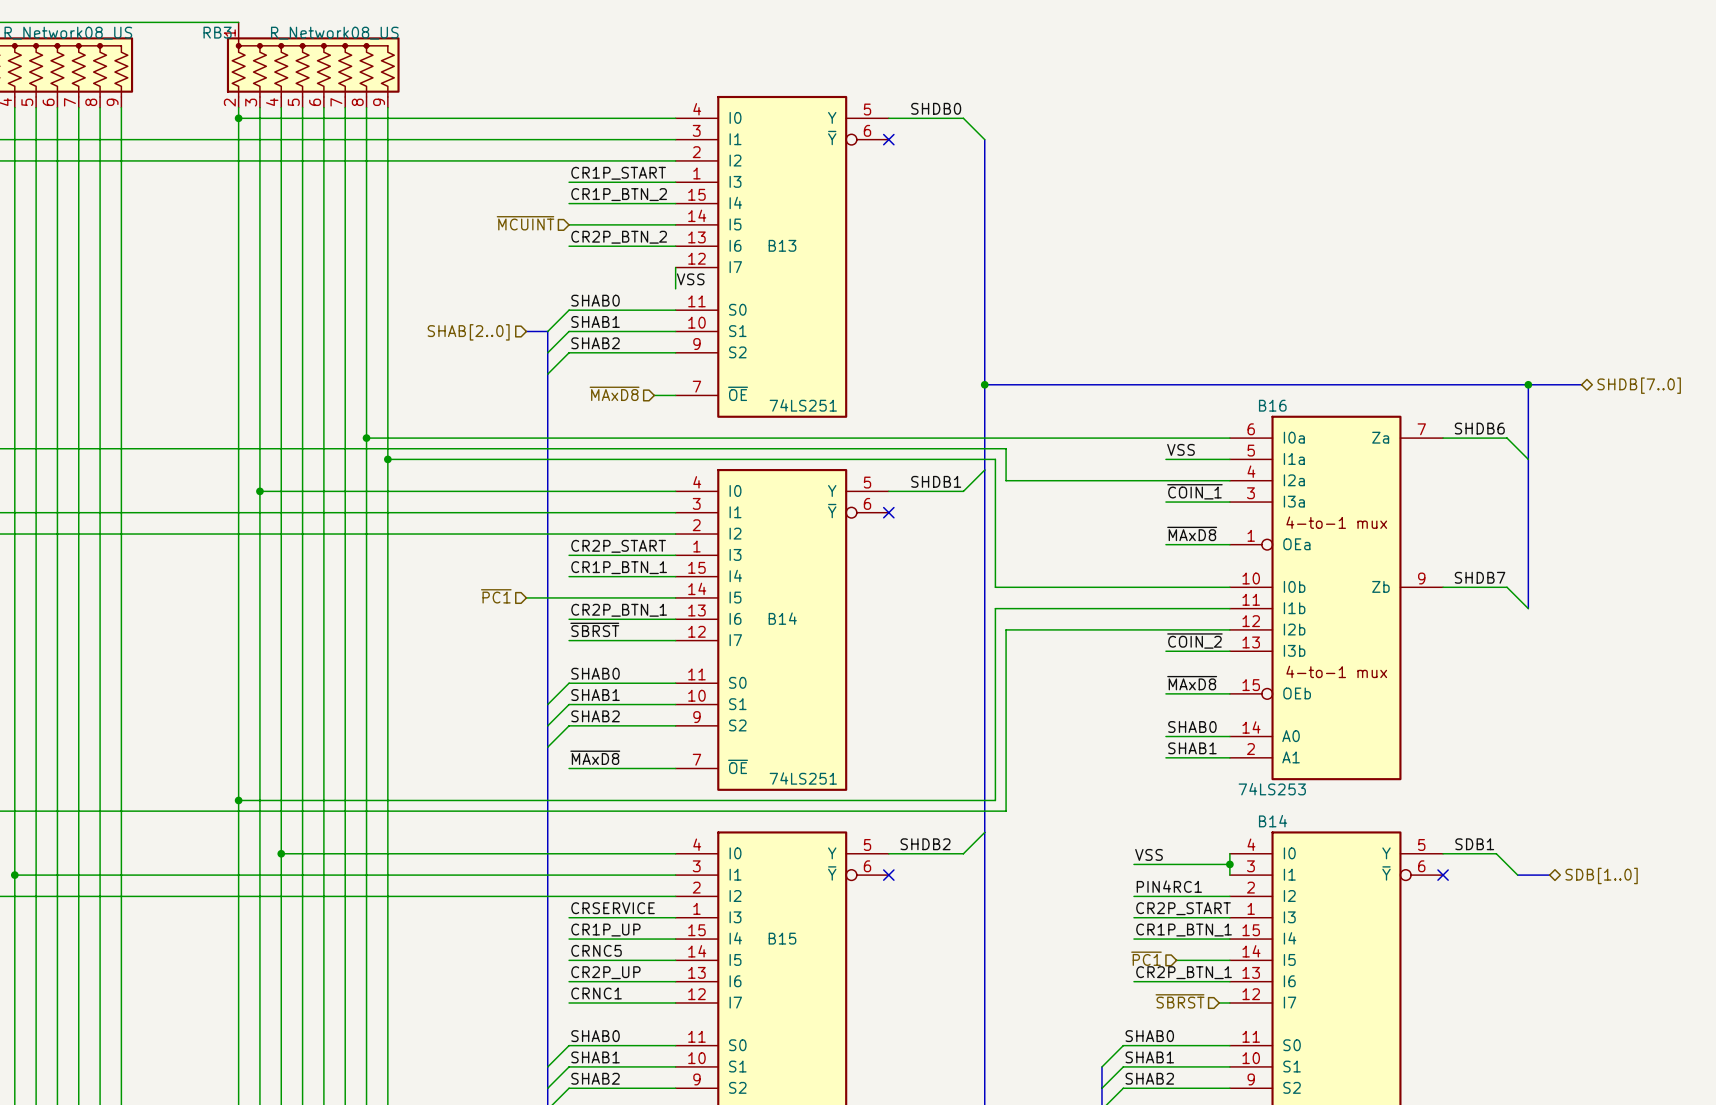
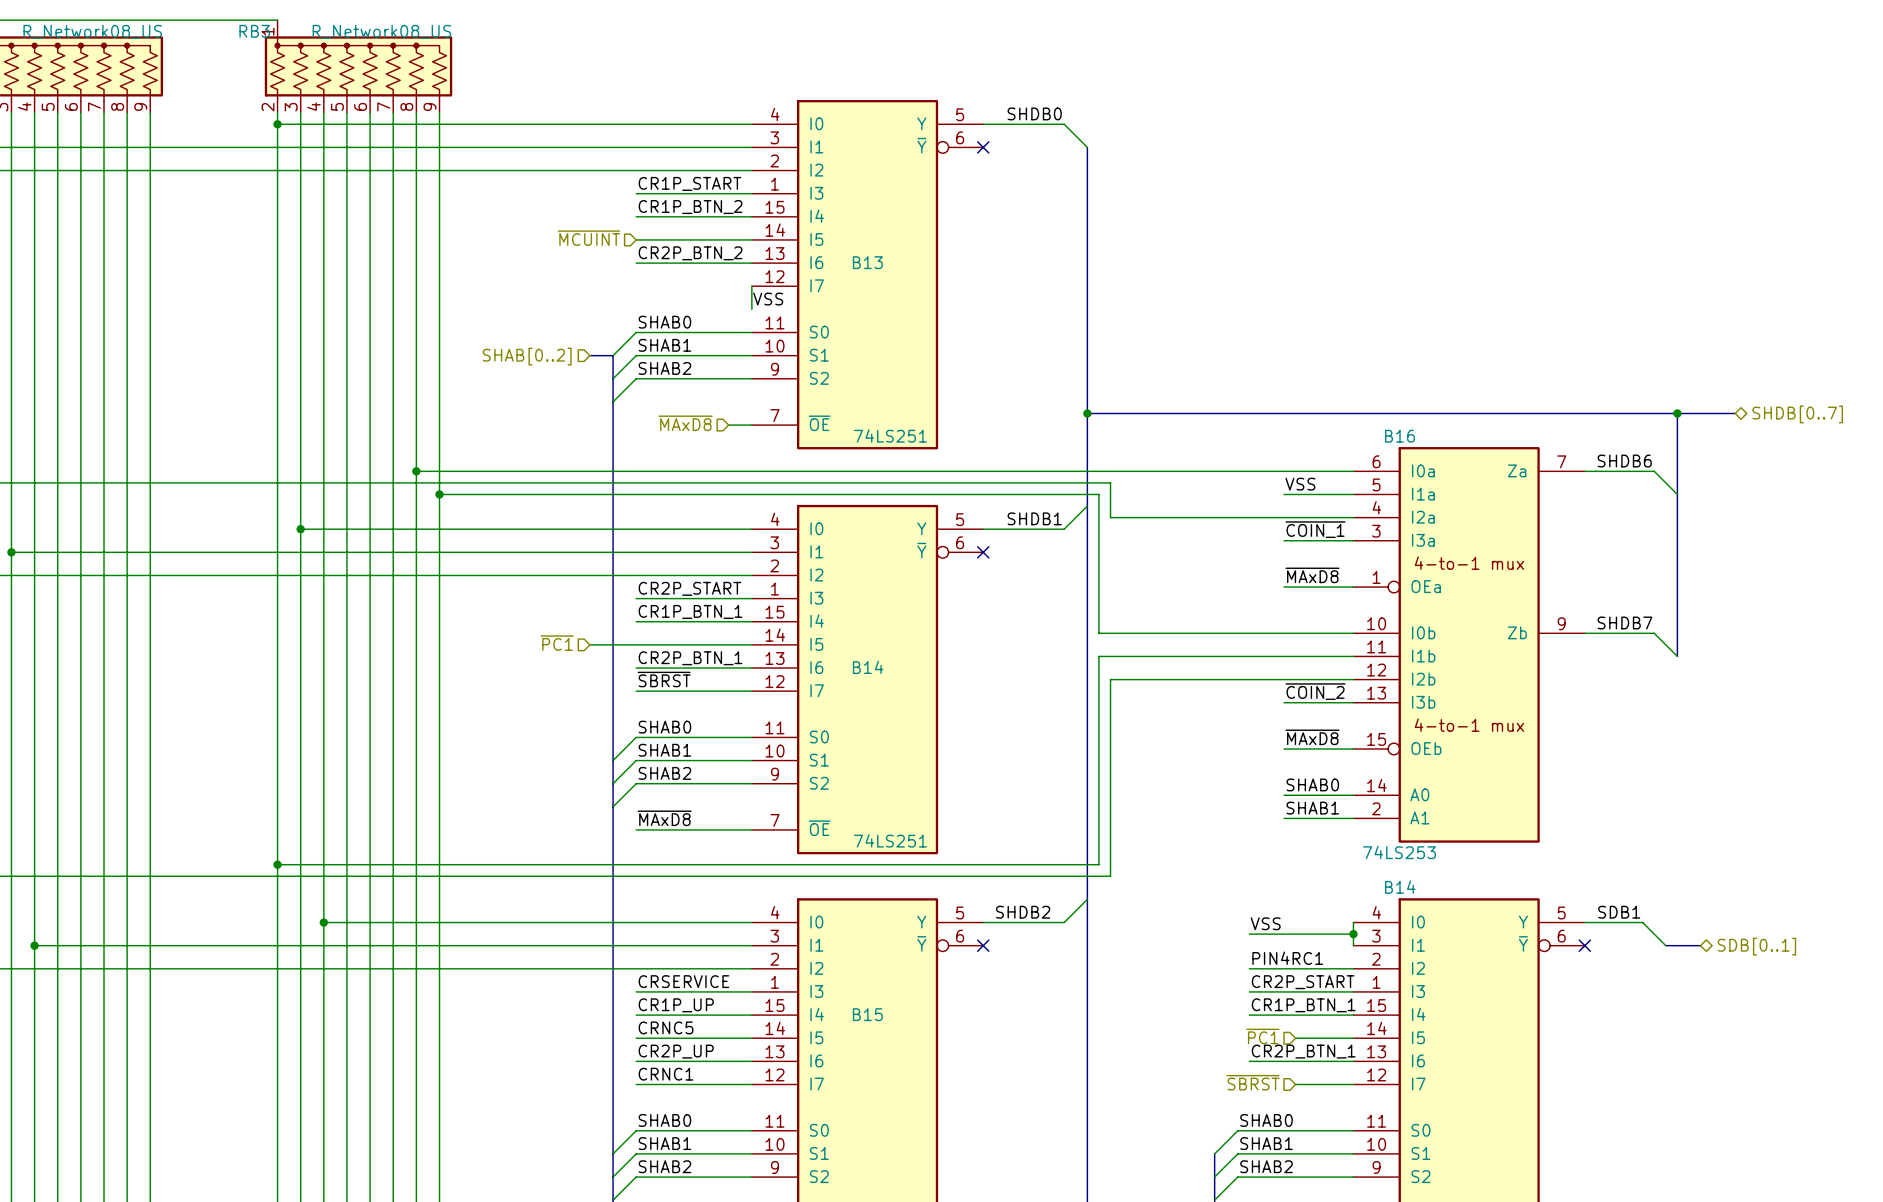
hierarchical label: SHAB[2..0] (468, 332) -> SHAB[0..2] (527, 356)
hierarchical label: SHDB[7..0] (1639, 385) -> SHDB[0..7] (1797, 414)
hierarchical label: SDB[1..0] (1601, 875) -> SDB[0..1] (1756, 946)
hierarchical label position: ~{SBRST} (1180, 1001) -> ~{SBRST} (1253, 1082)
wire: none -> (1295, 1084) (1341, 1084)

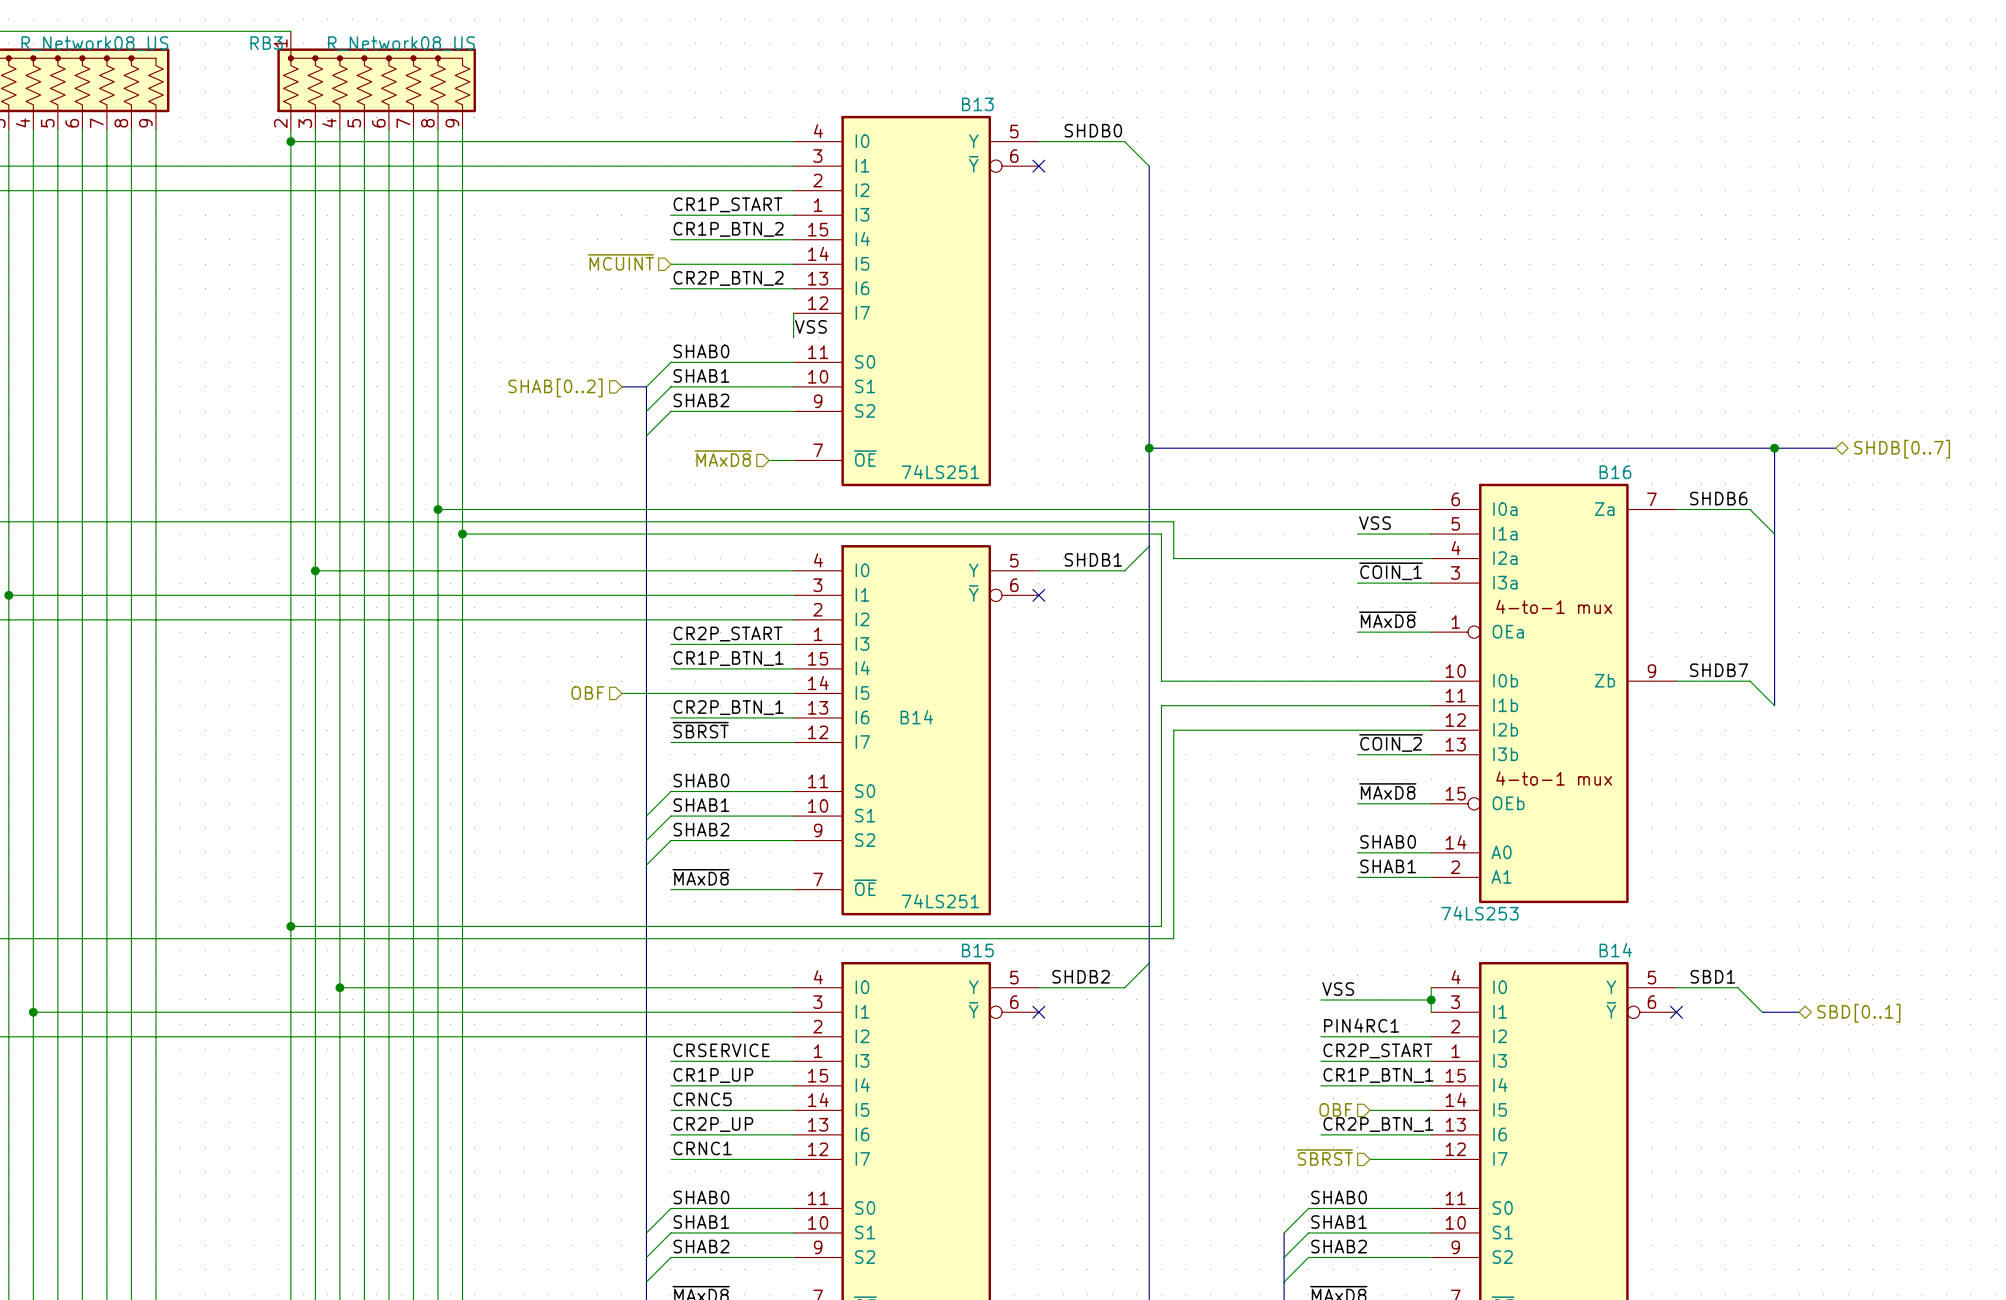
B13 name position: B13 (867, 262) -> B13 (977, 104)
B16 name position: B16 (1400, 436) -> B16 (1615, 472)
hierarchical label: ~{PC1} (557, 643) -> OBF (587, 692)
B14 name position: B14 (1400, 887) -> B14 (1615, 950)
label: SDB1 (1619, 912) -> SBD1 (1712, 976)
hierarchical label: SDB[0..1] (1756, 946) -> SBD[0..1] (1858, 1013)
B15 name position: B15 (867, 1014) -> B15 (977, 950)
hierarchical label: ~{PC1} (1262, 1036) -> OBF (1335, 1109)

